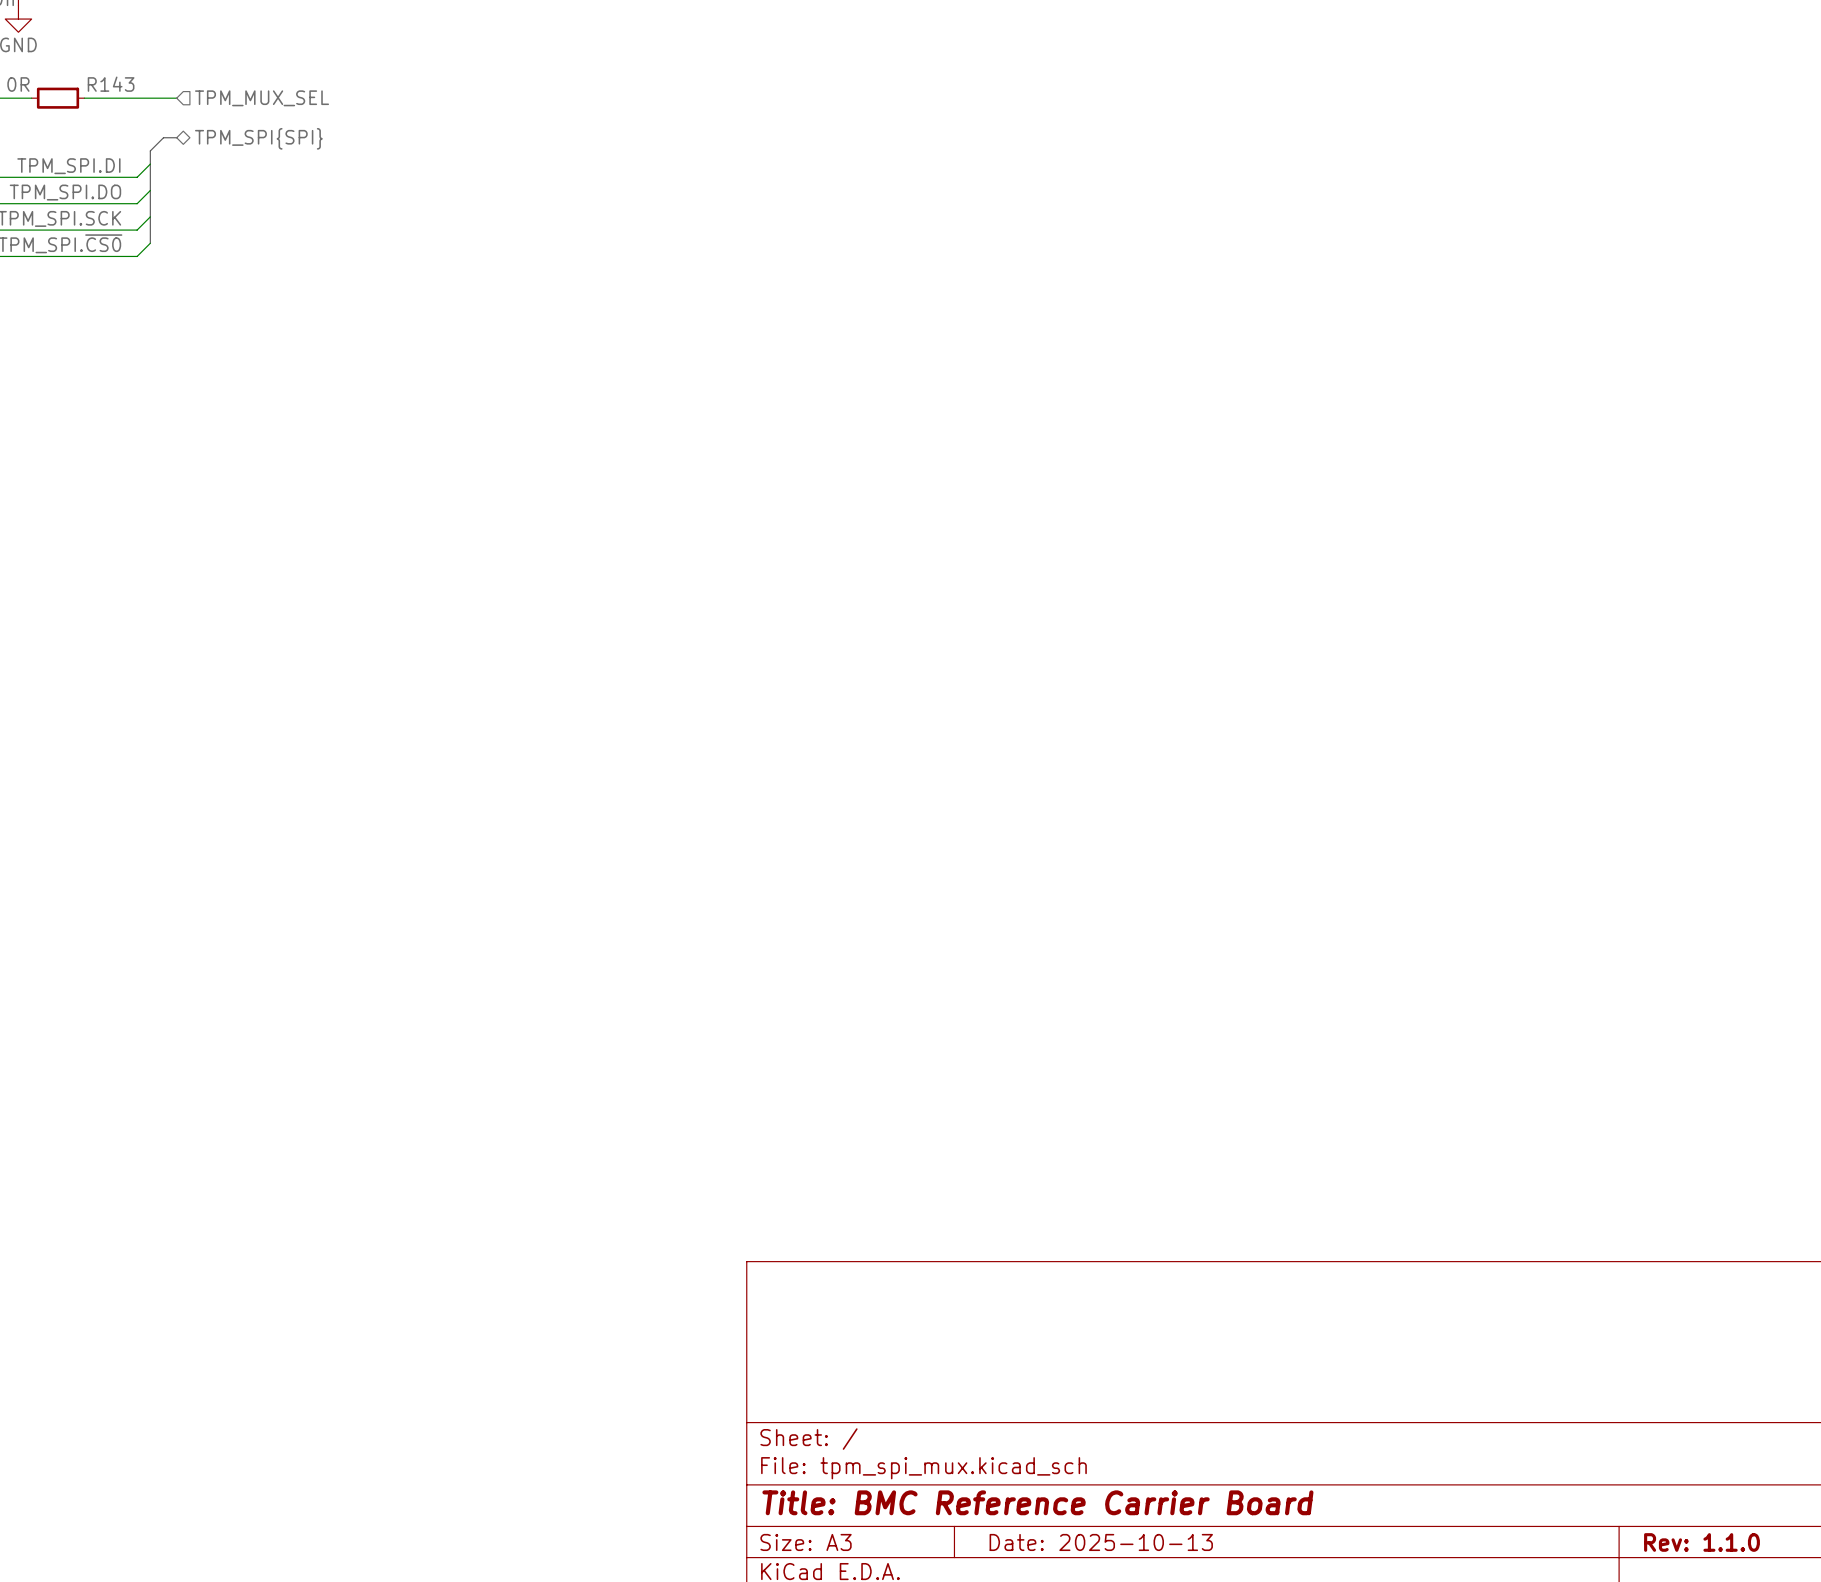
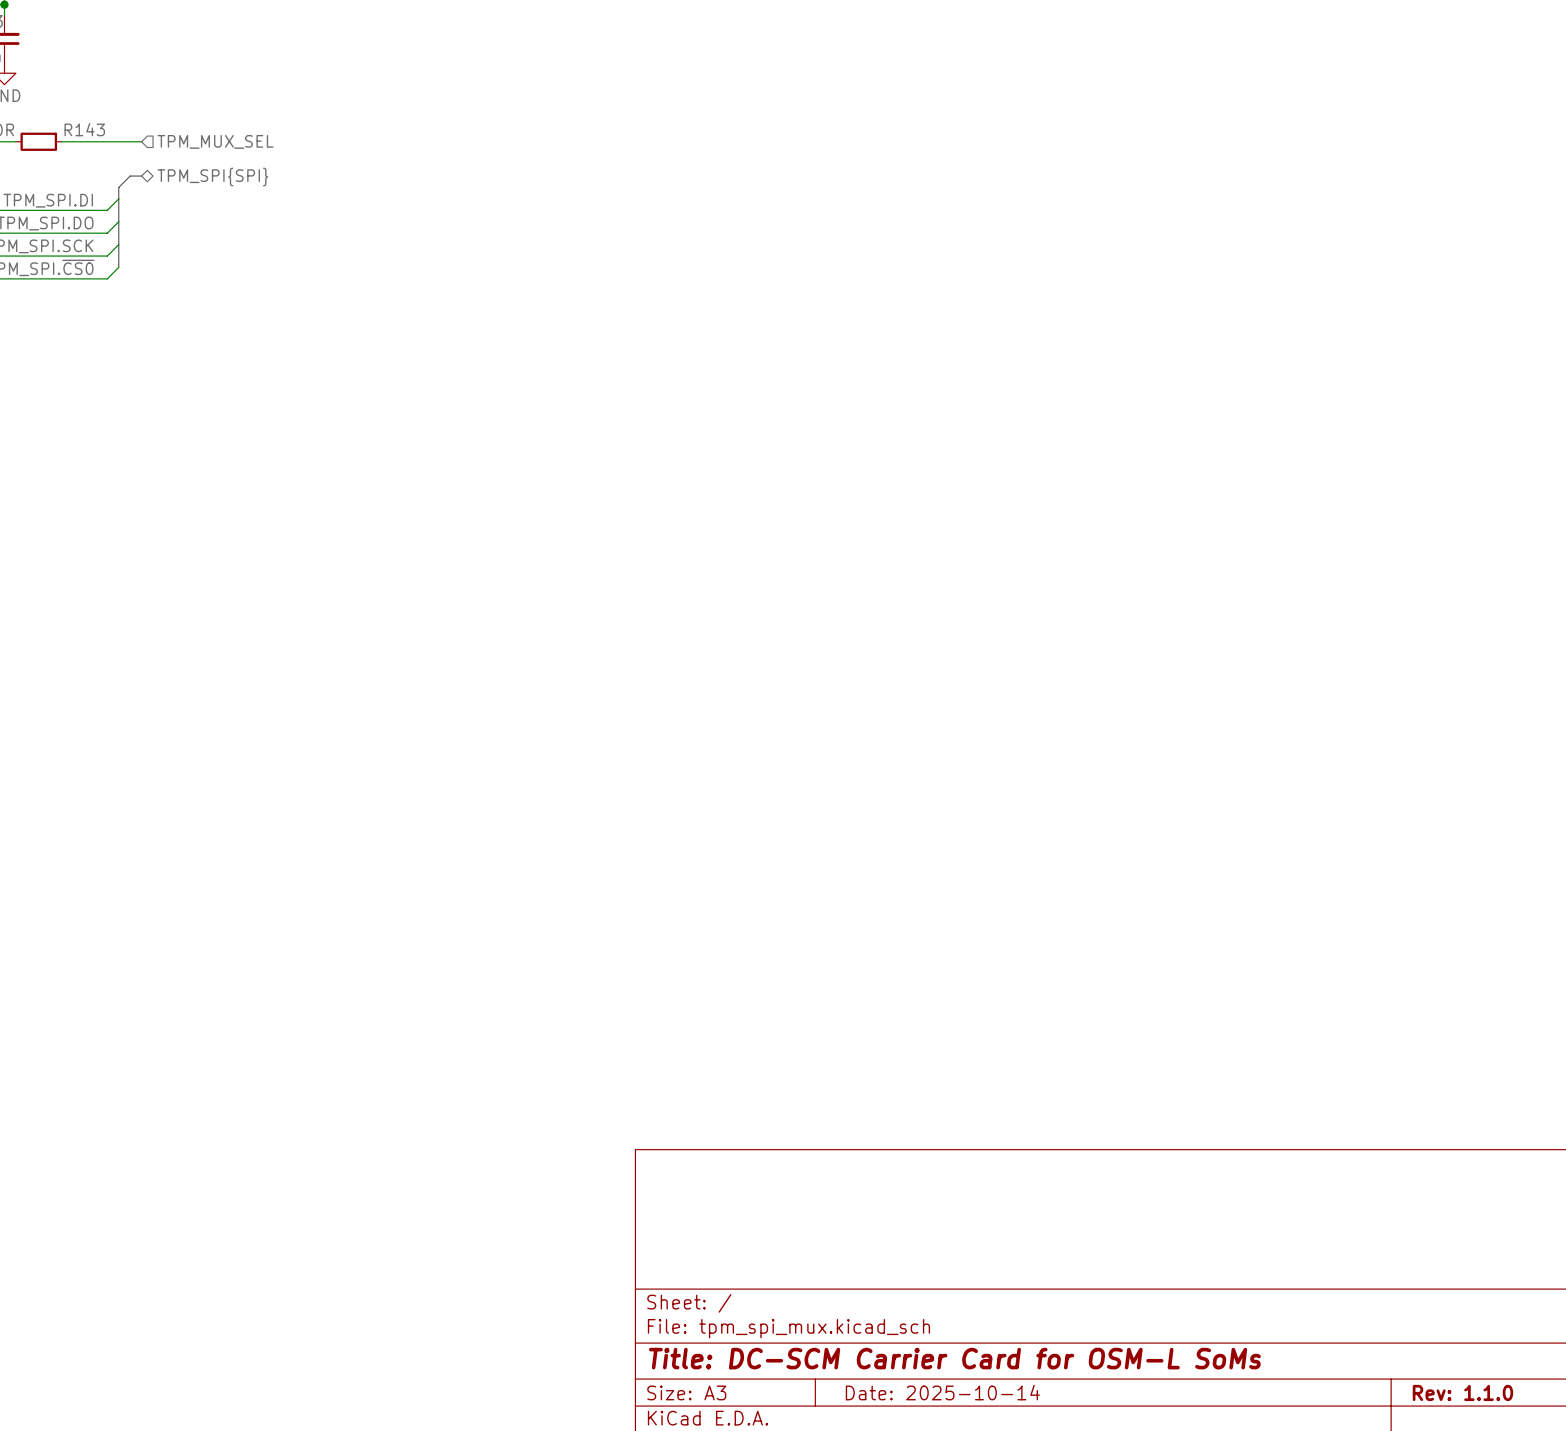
title block: Title: BMC Reference Carrier Board (1037, 1502) -> Title: DC-SCM Carrier Card for OSM-L SoMs (954, 1358)
title block: Date: 2025-10-13 (1101, 1542) -> Date: 2025-10-14 (942, 1392)

